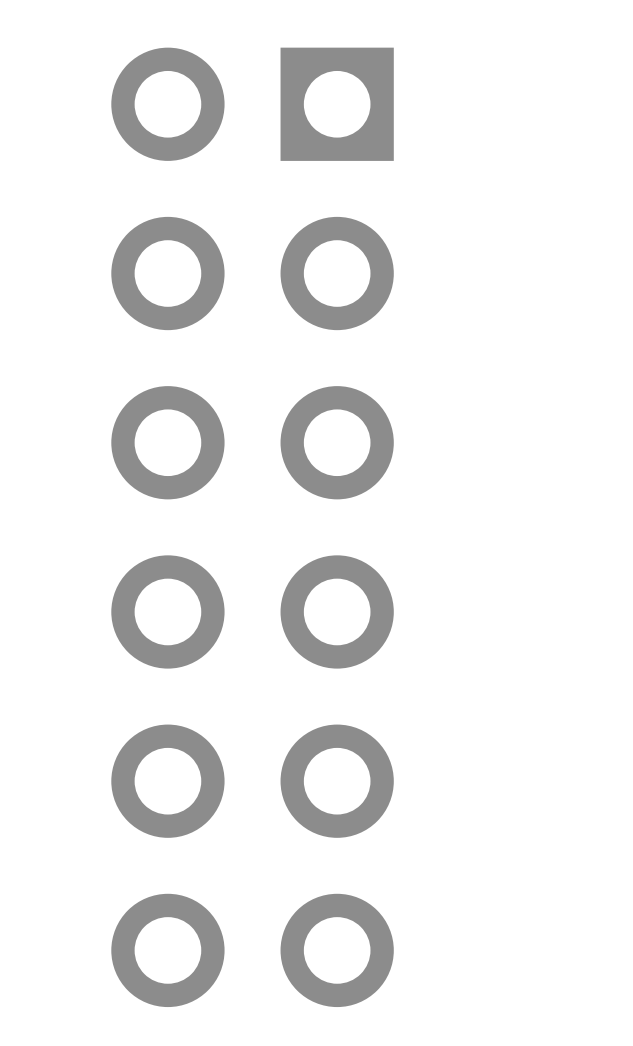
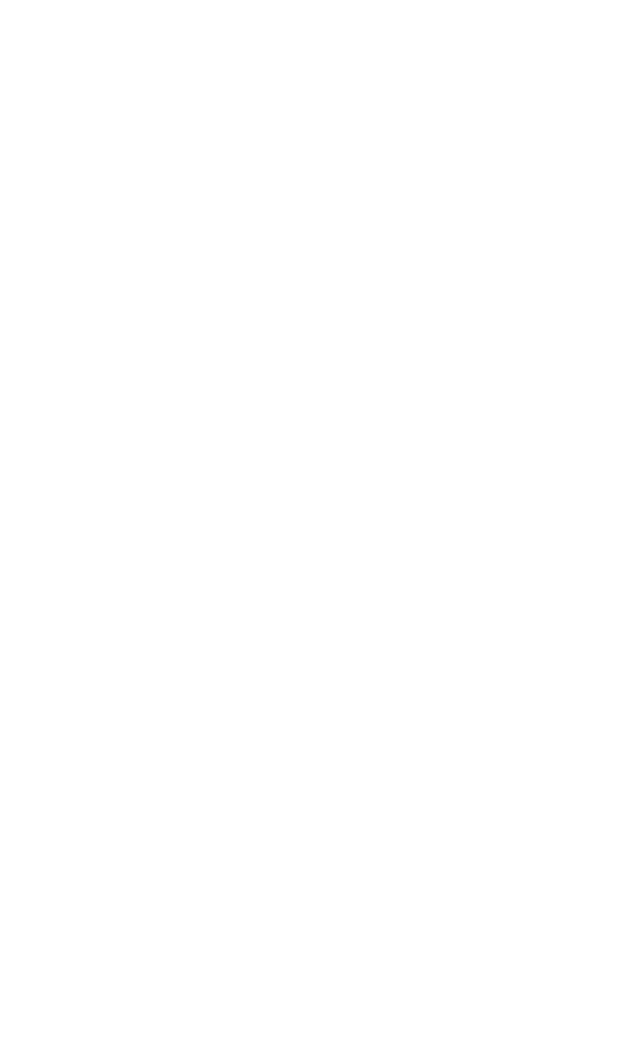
part: (252, 527) -> none

